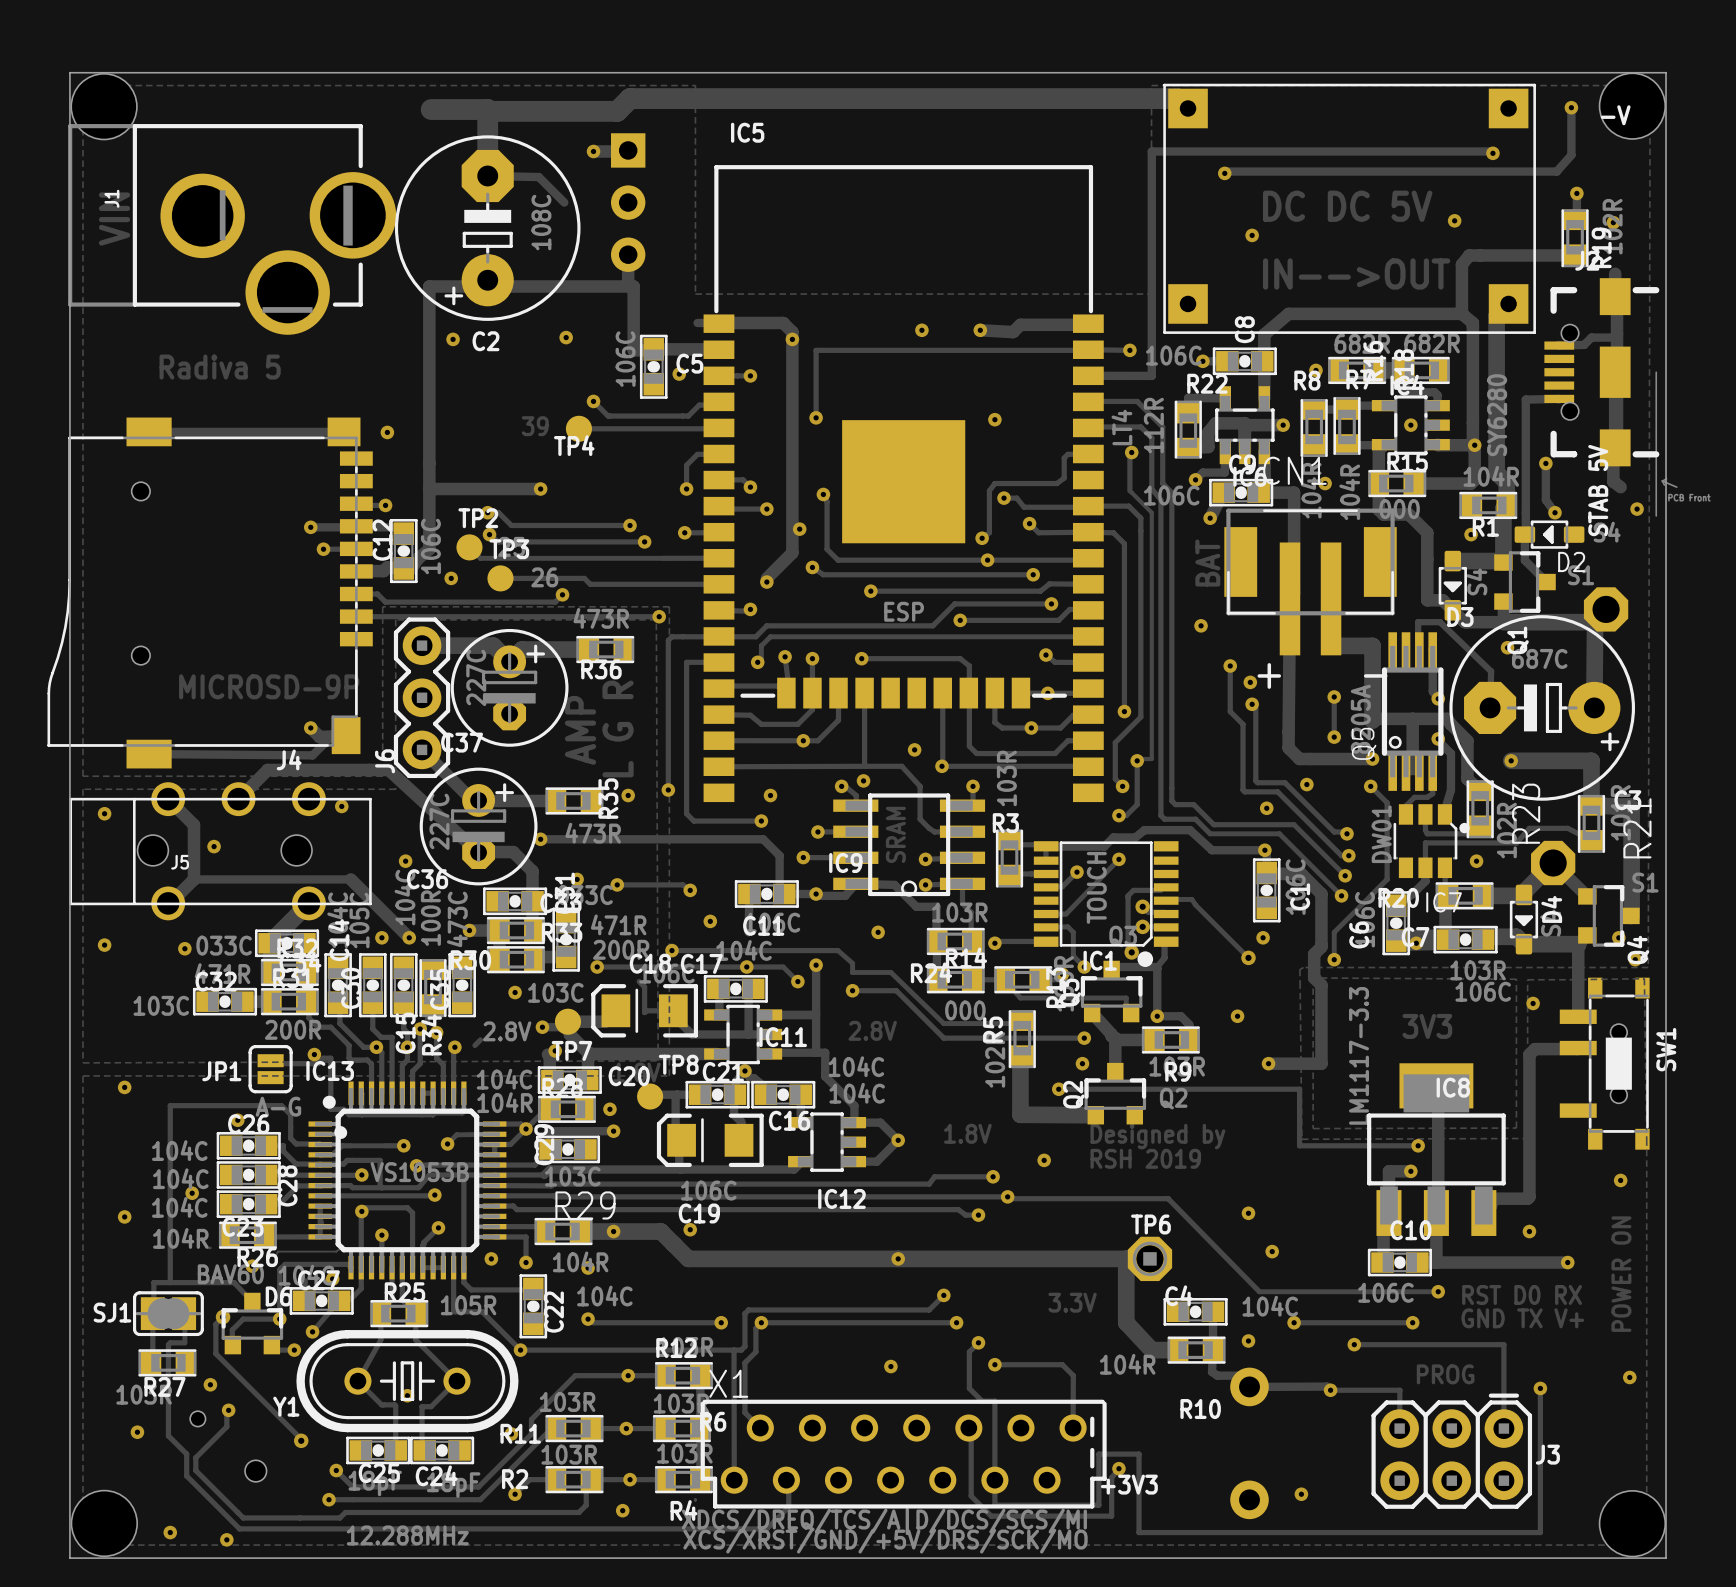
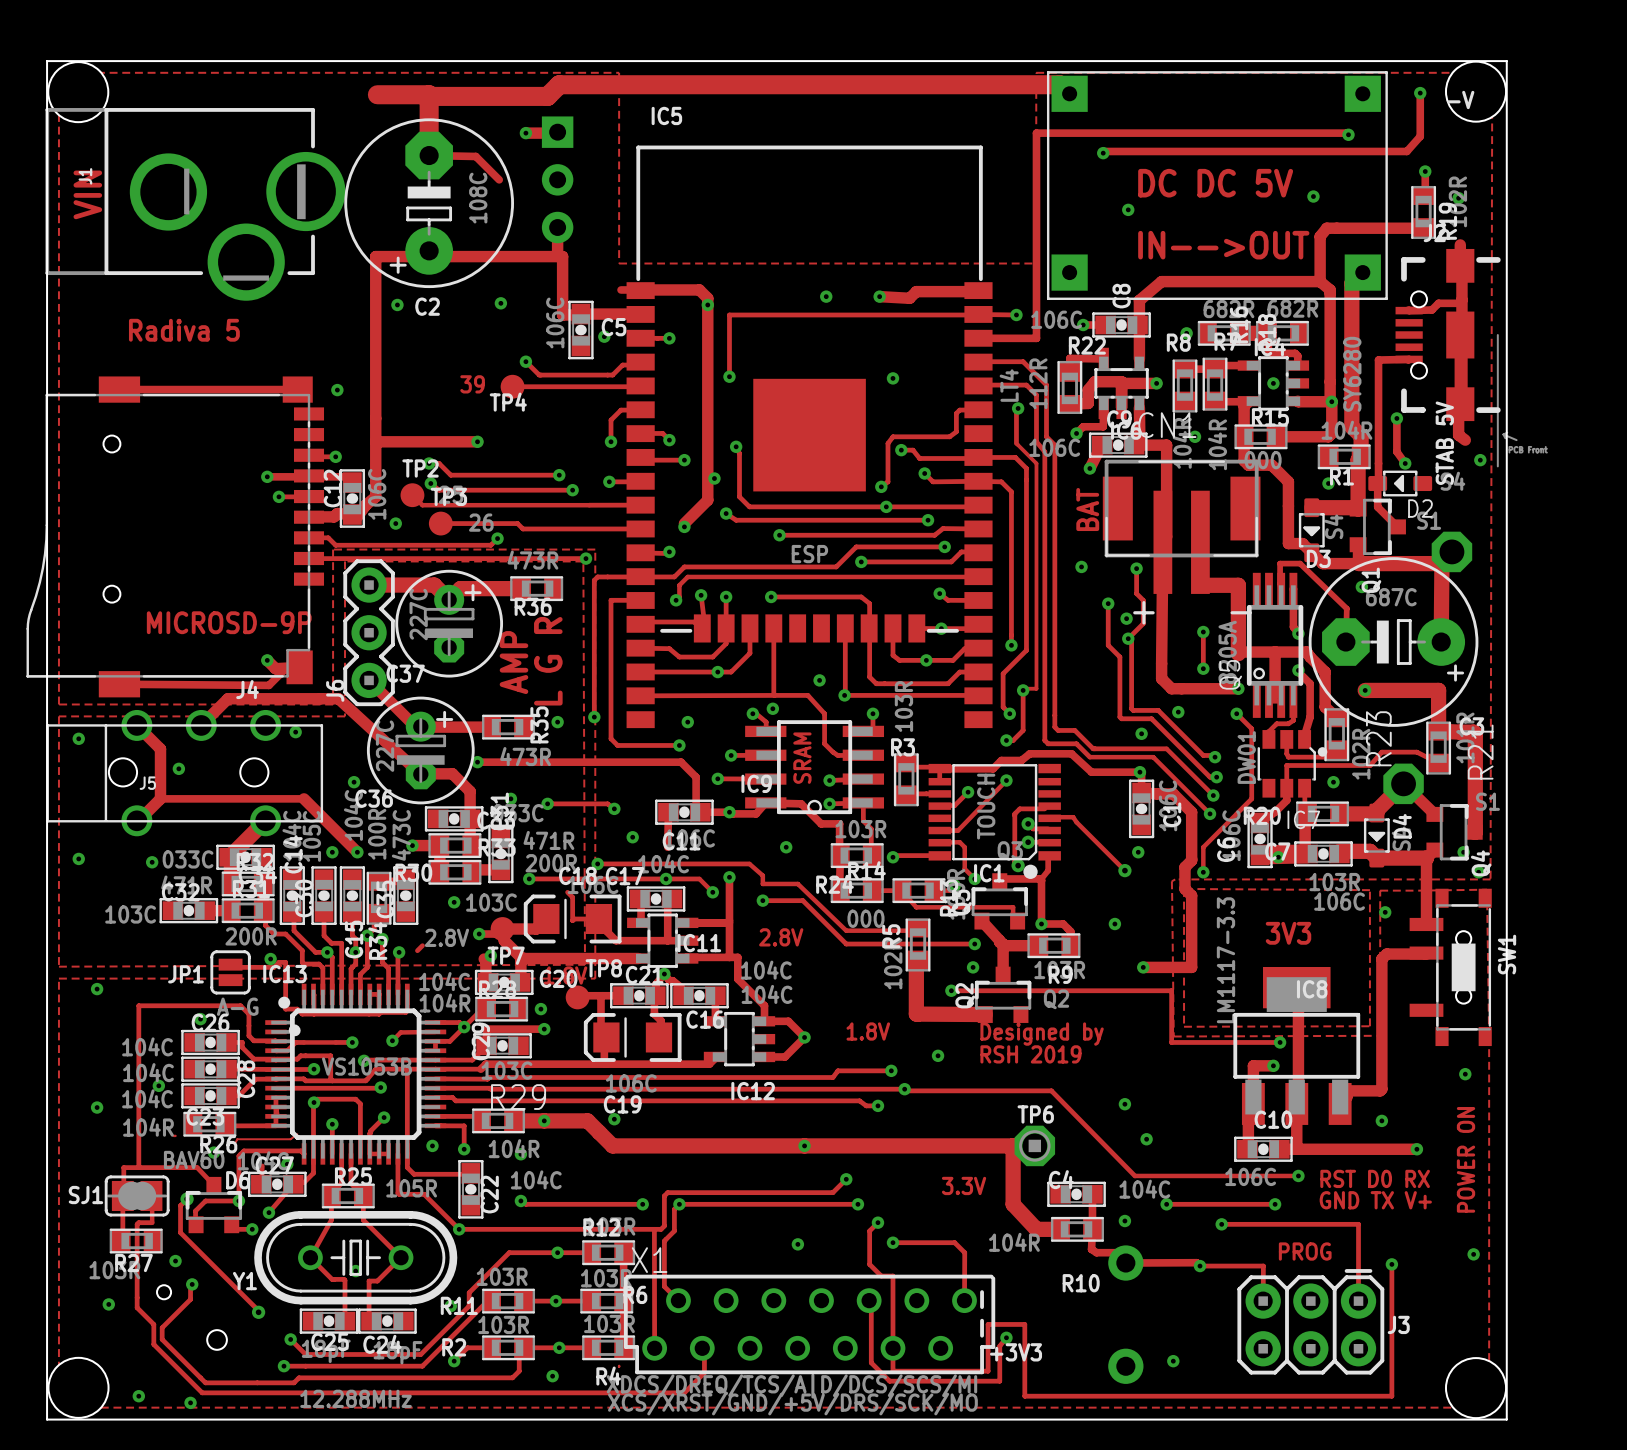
track: none -> (1136, 568) (1136, 593) (1143, 600) (1143, 623) (1128, 638)
via: none -> (1136, 568)

